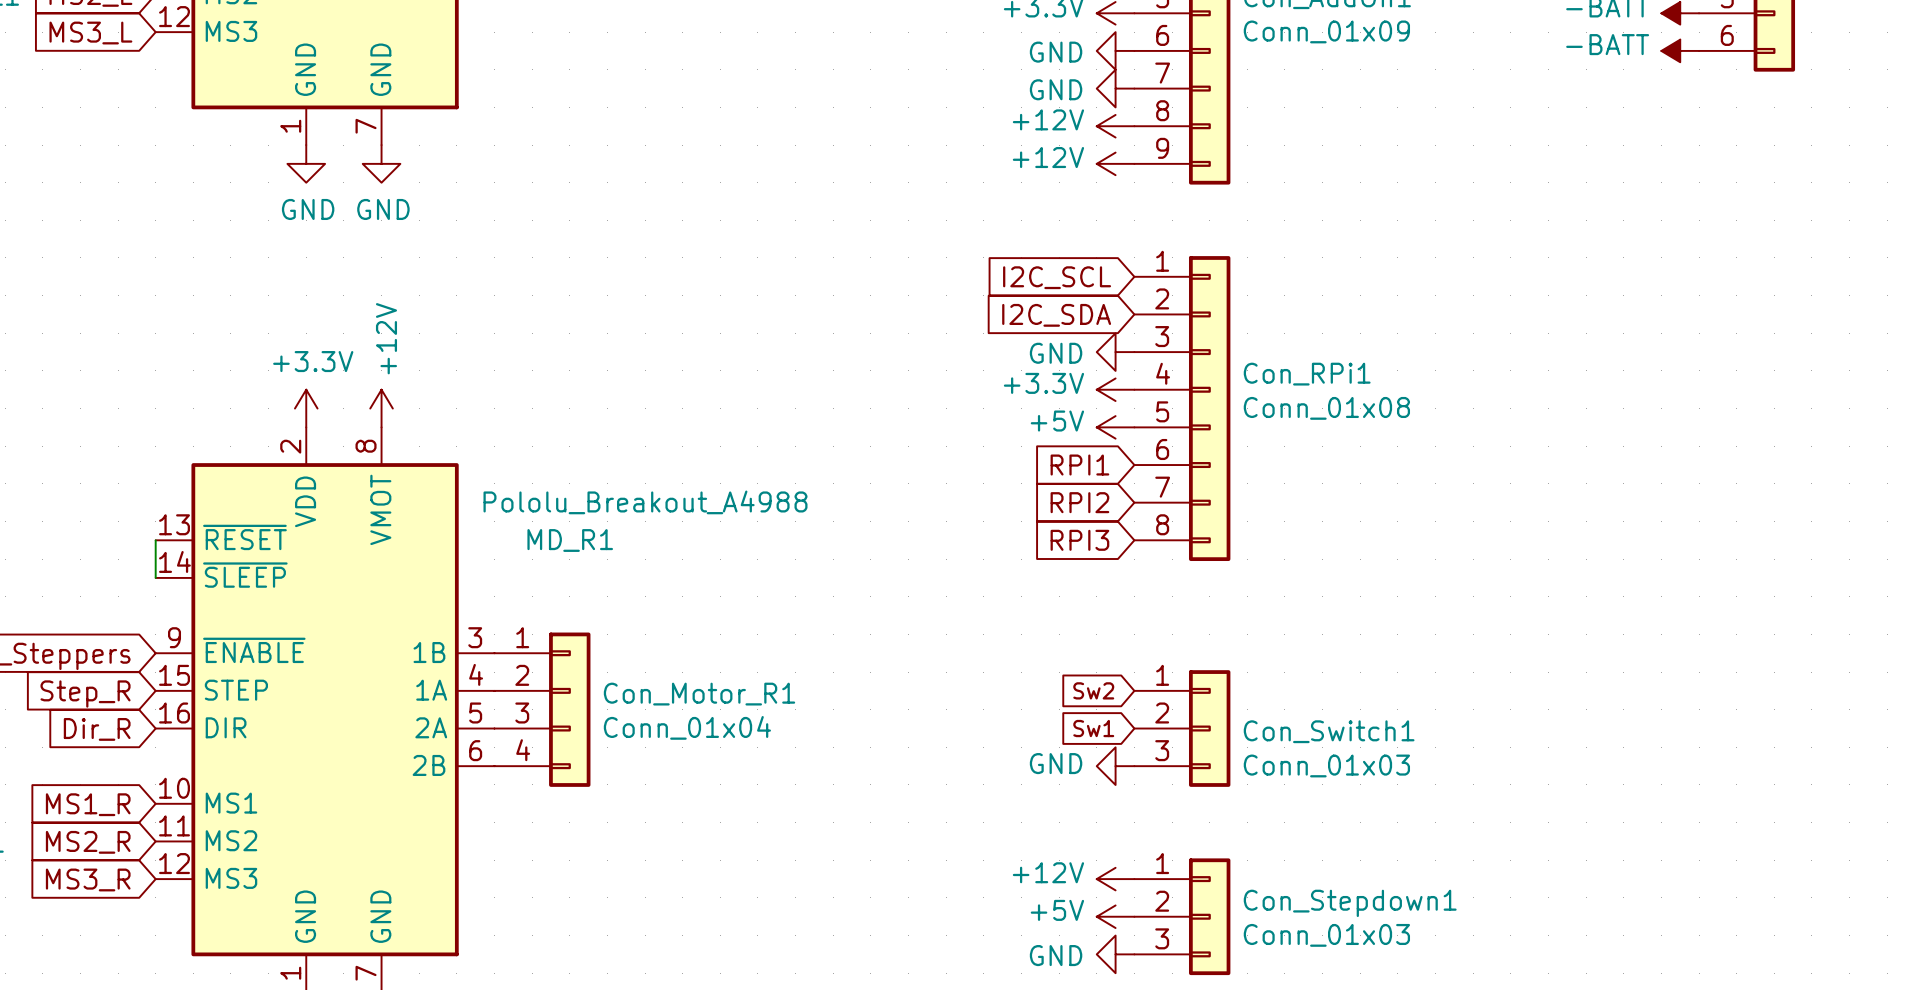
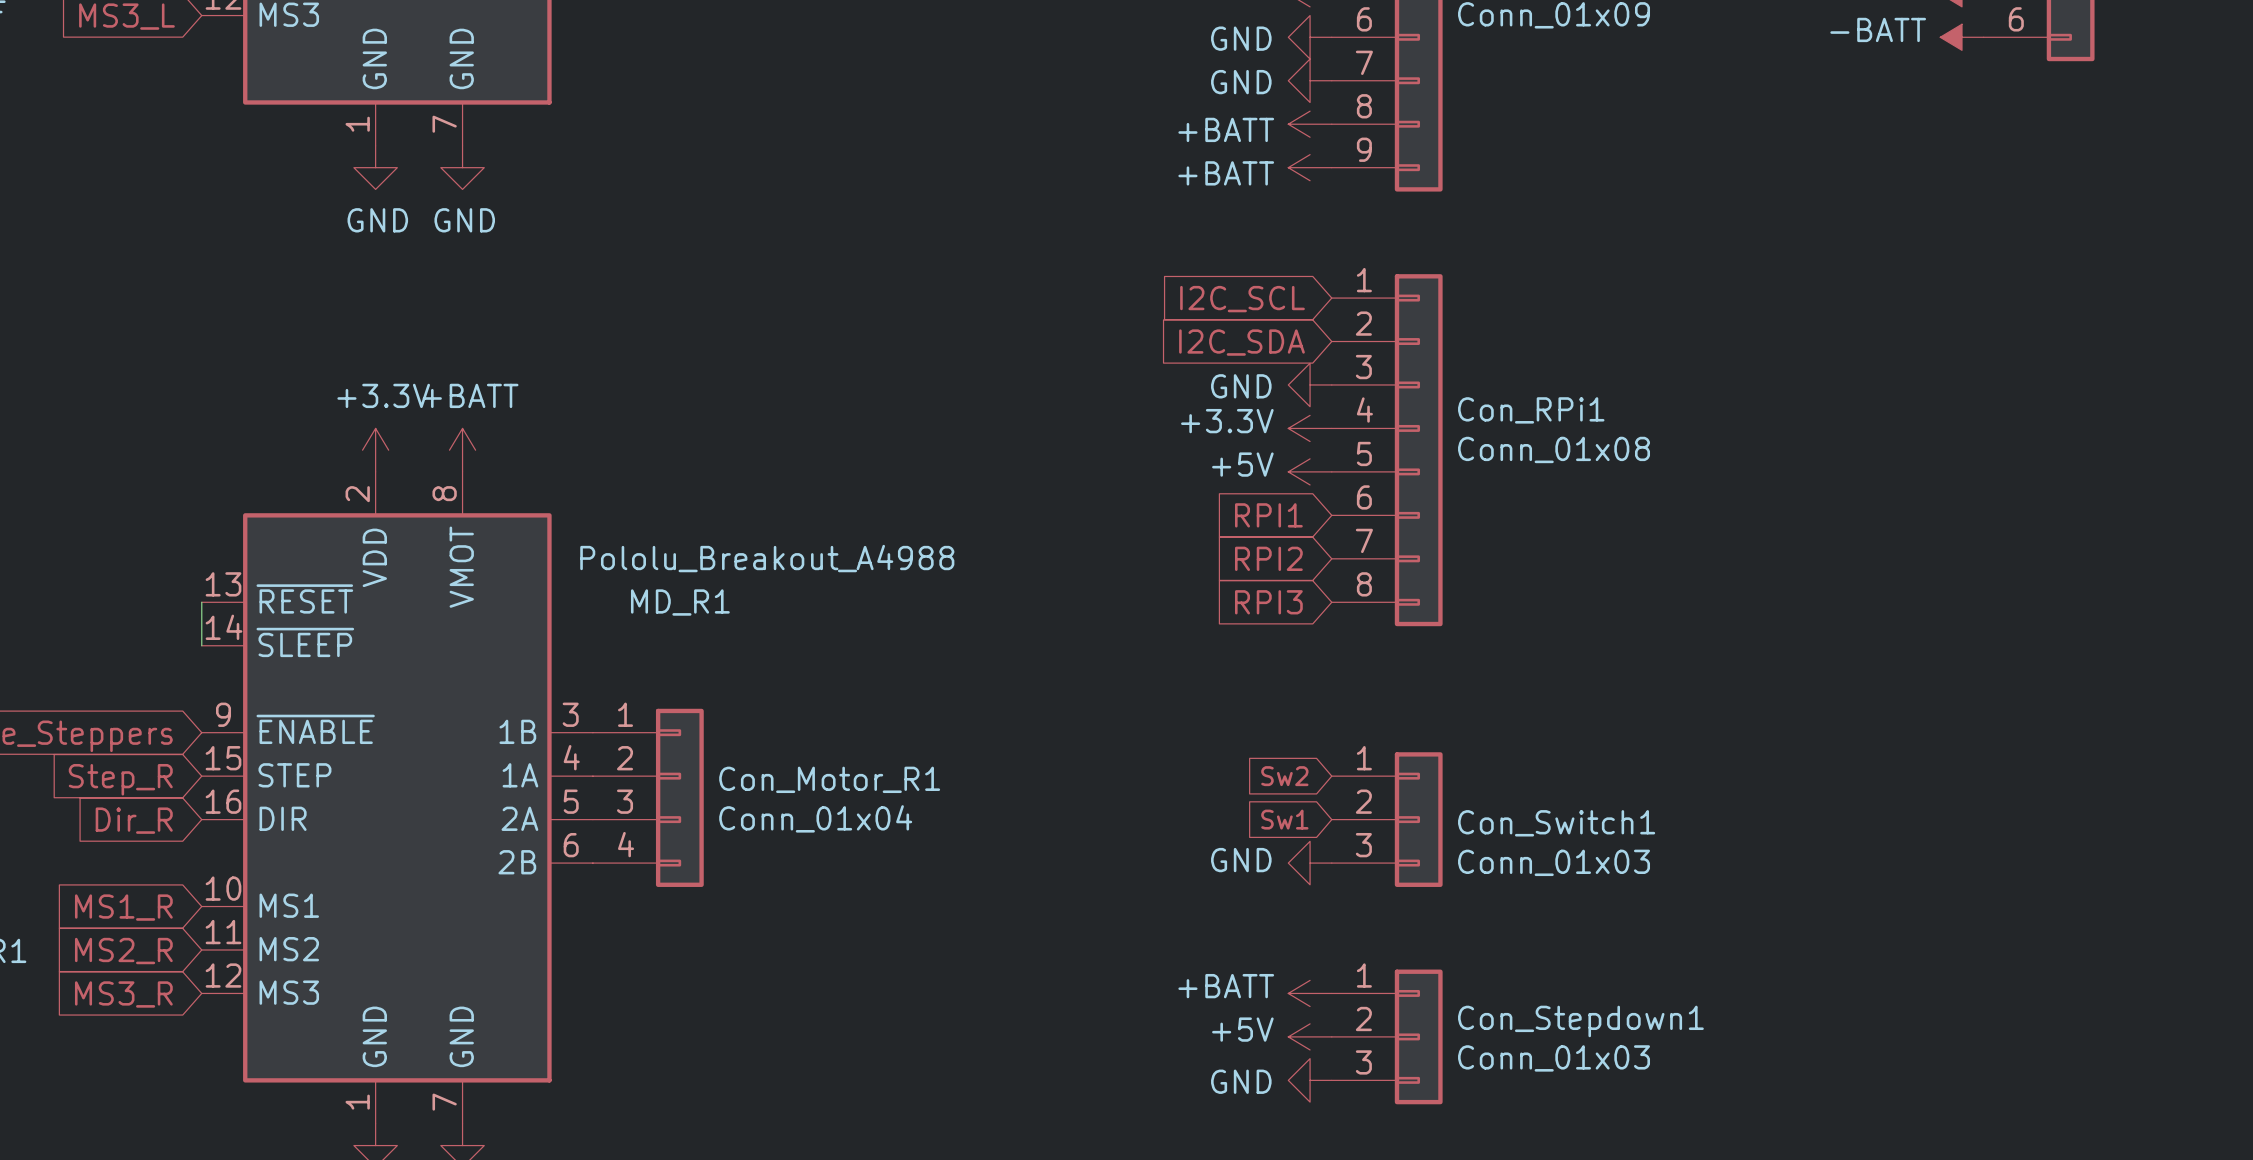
power symbol: +12V (1115, 126) -> +BATT (1310, 124)
power symbol: +12V (1115, 163) -> +BATT (1310, 167)
power symbol: +12V (381, 408) -> +BATT (462, 450)
power symbol: +12V (1115, 879) -> +BATT (1310, 993)

